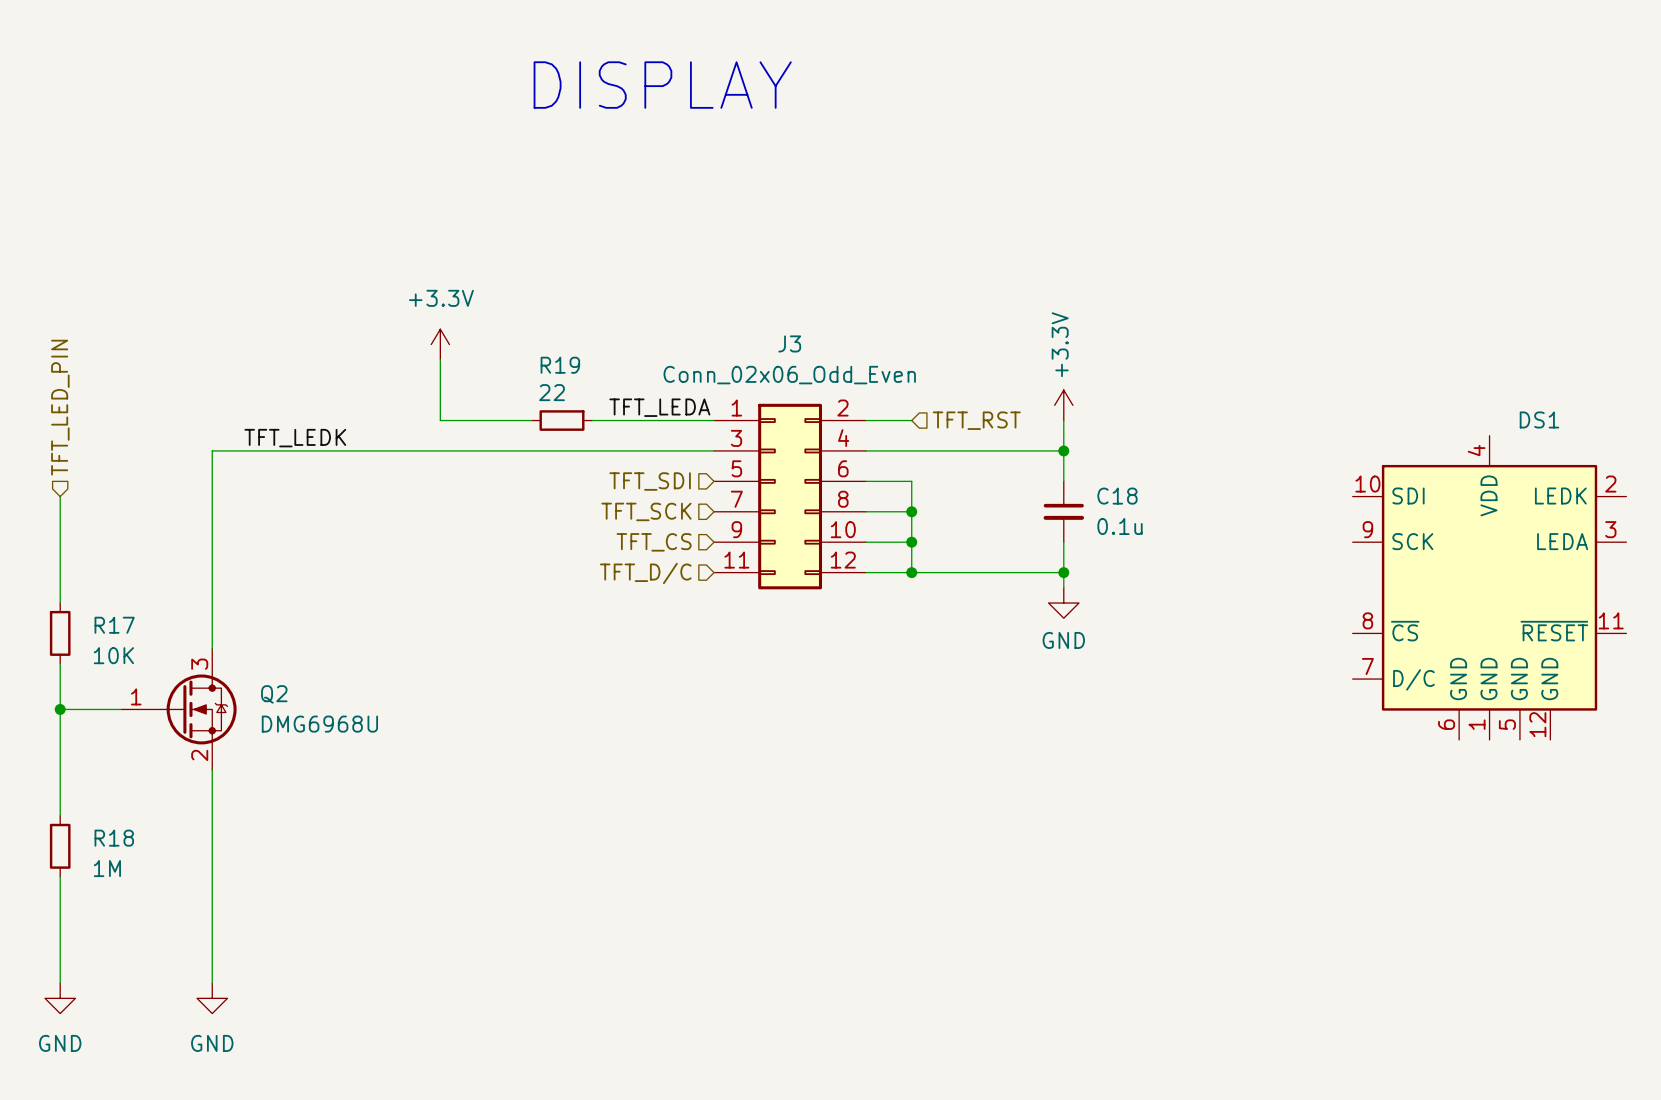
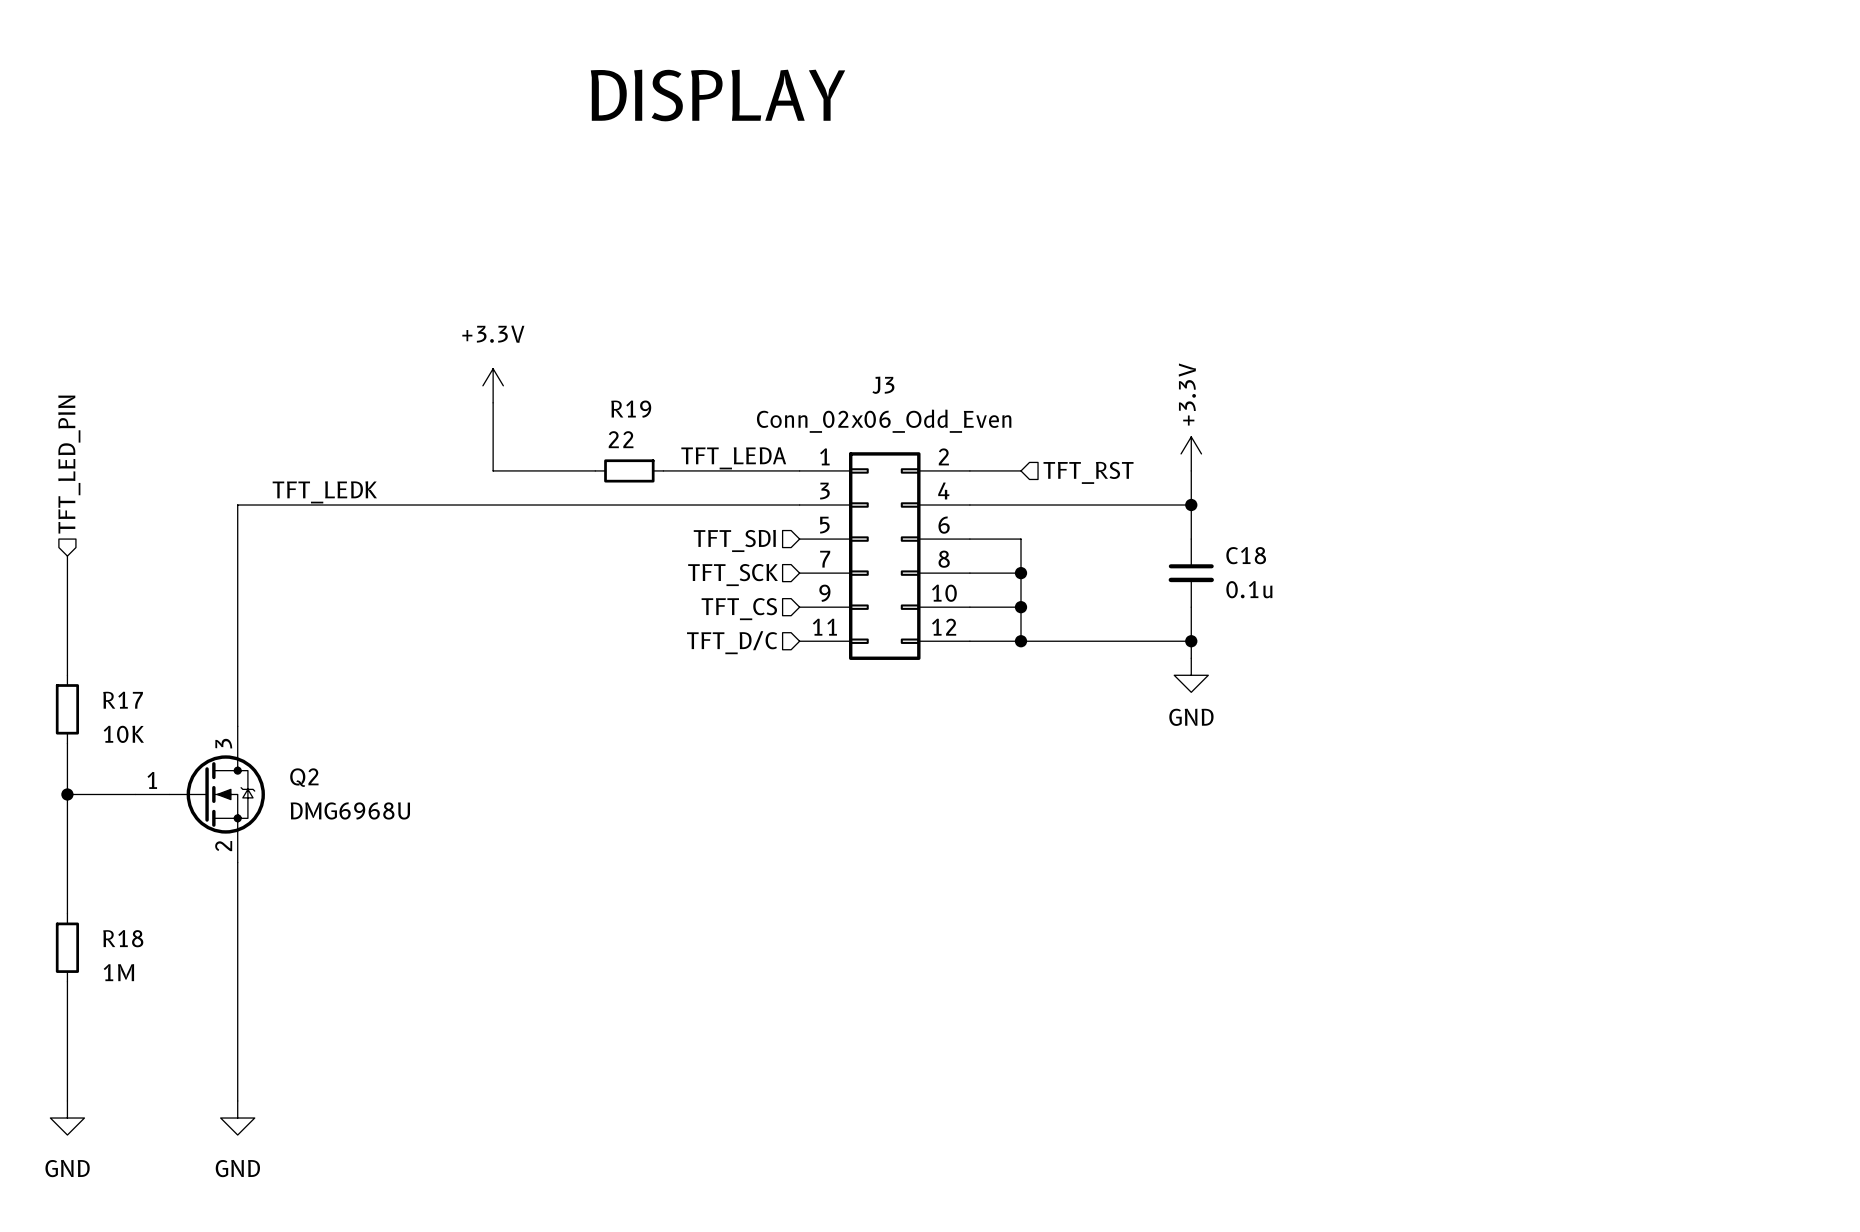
DS1: (1489, 587) -> none

